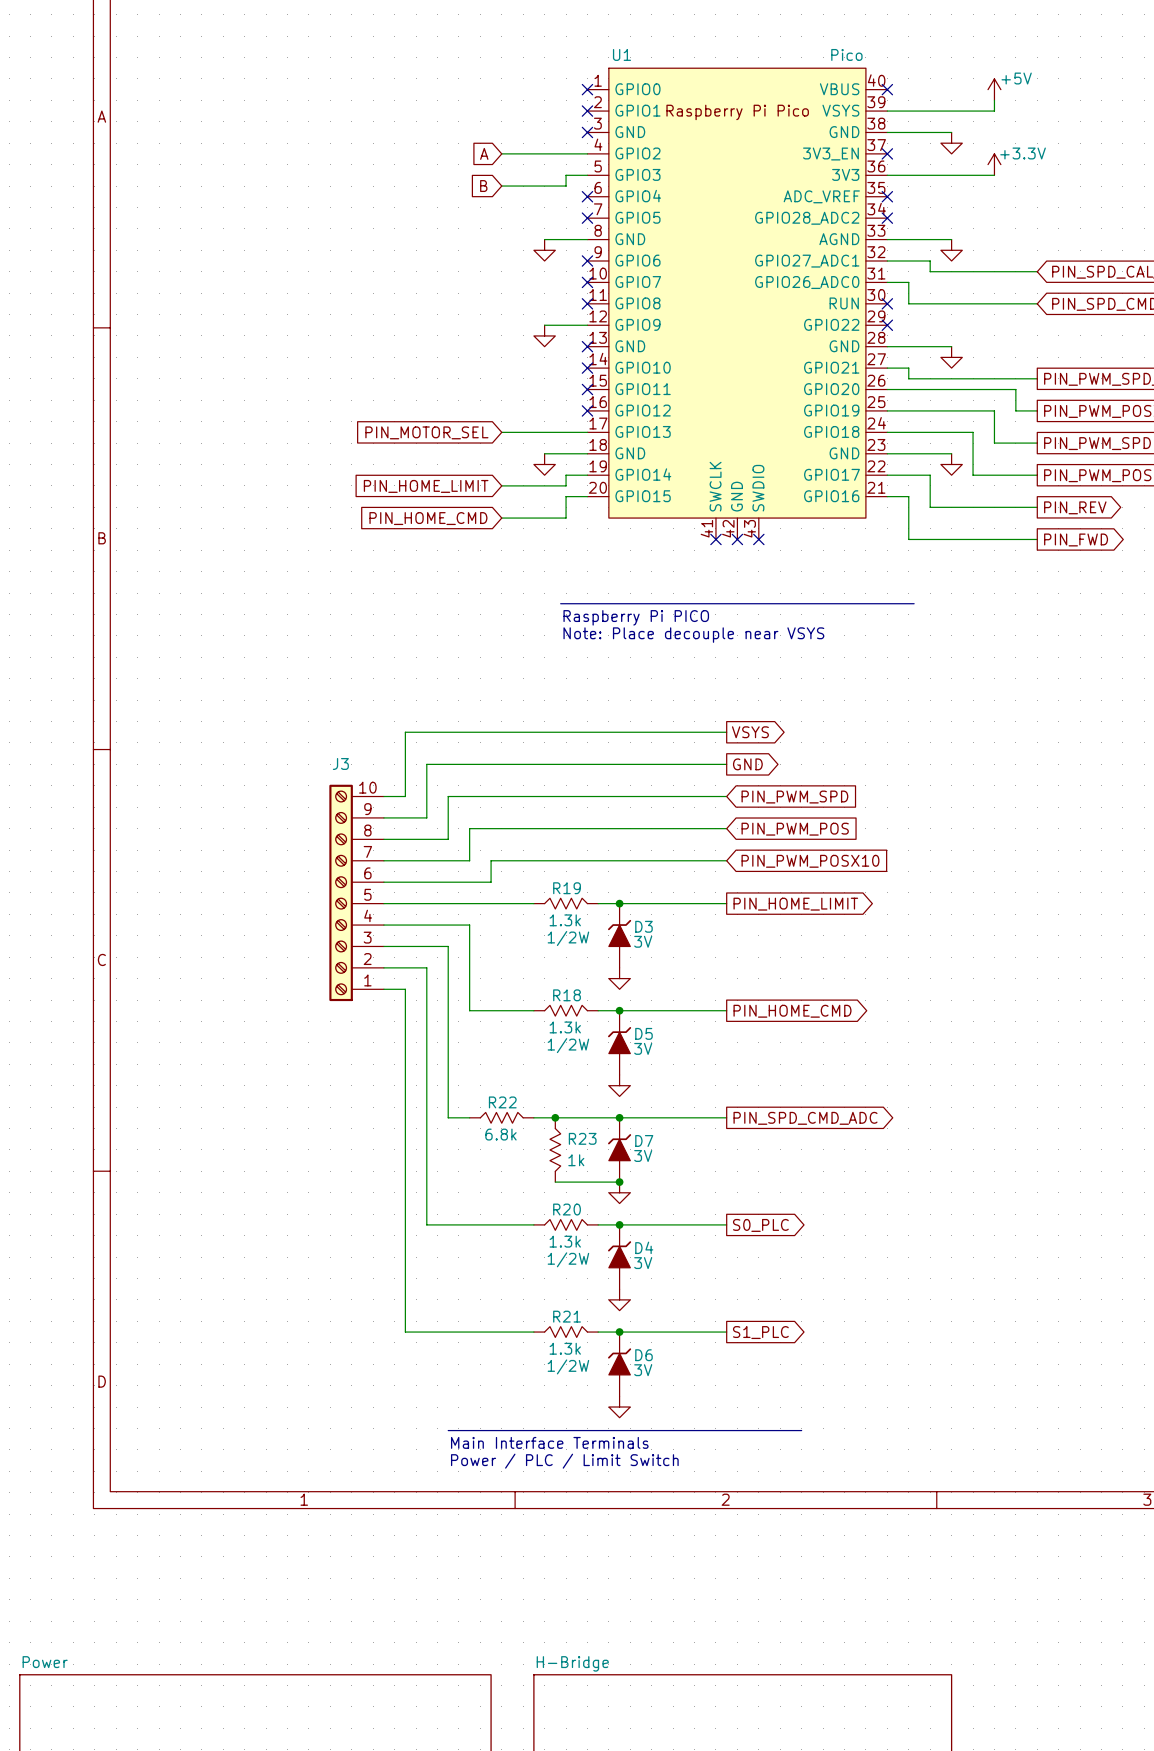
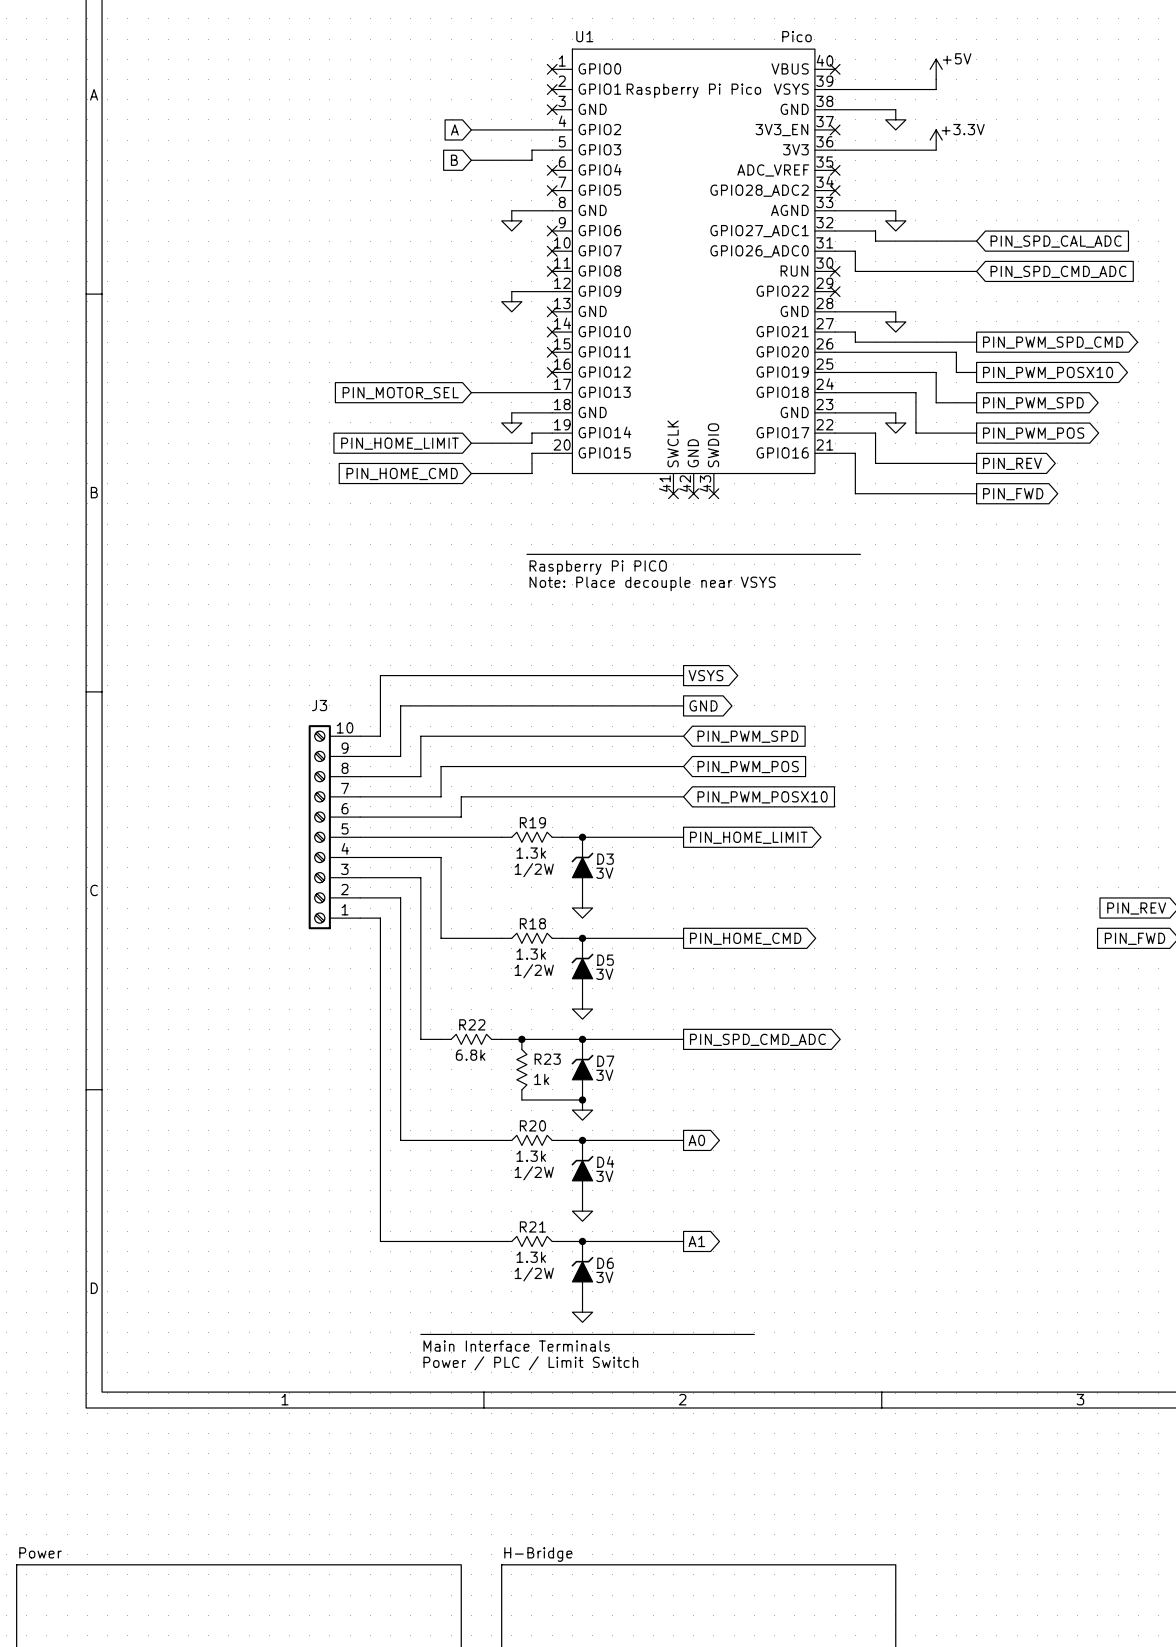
global label: S0_PLC (760, 1225) -> A0 (696, 1140)
global label: S1_PLC (760, 1332) -> A1 (696, 1241)

